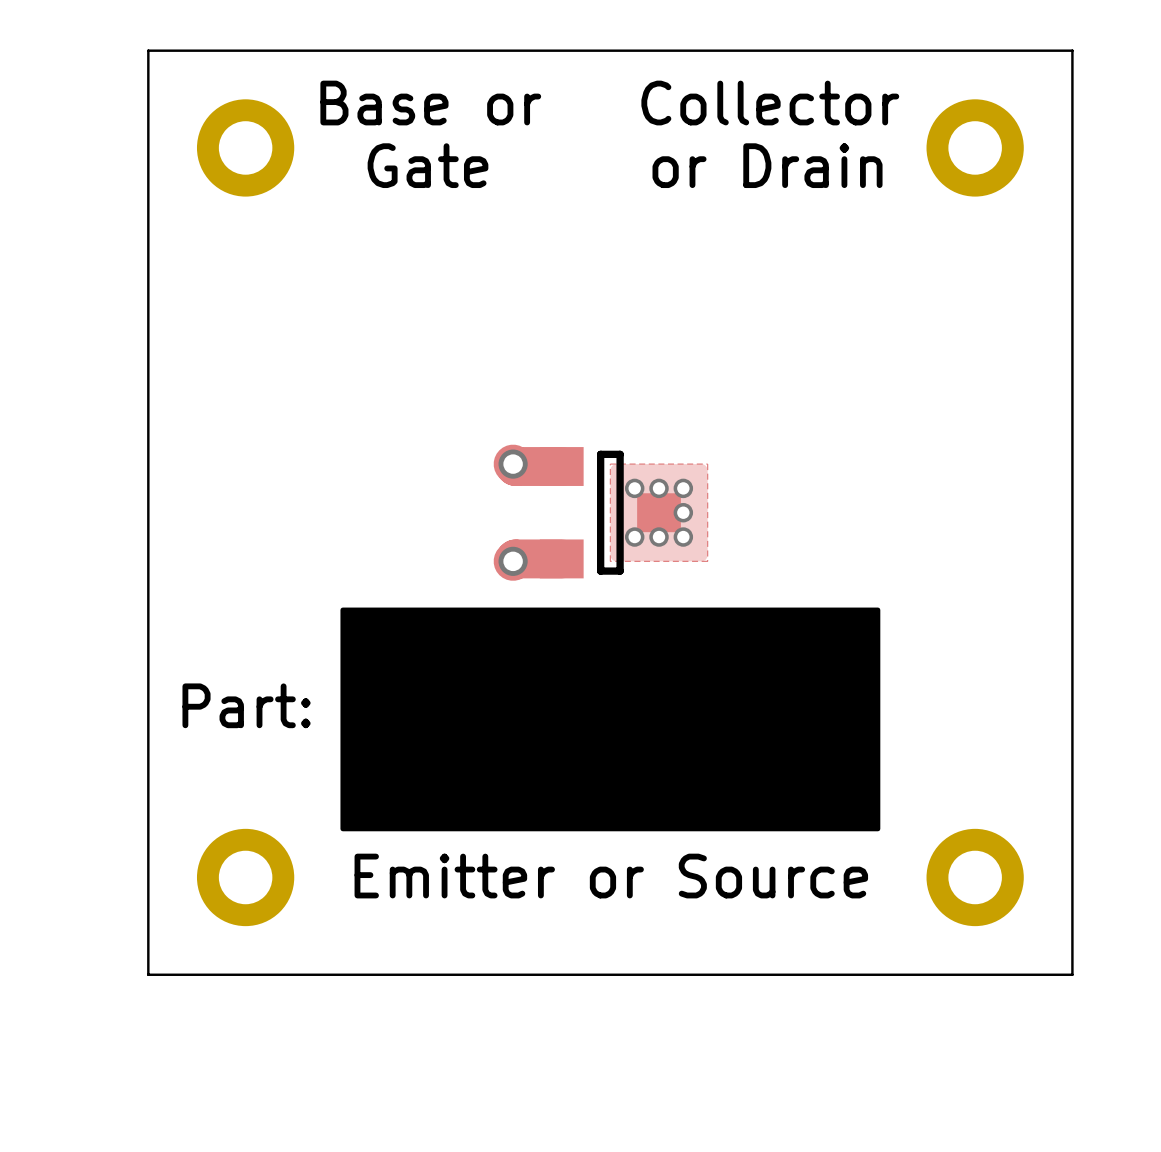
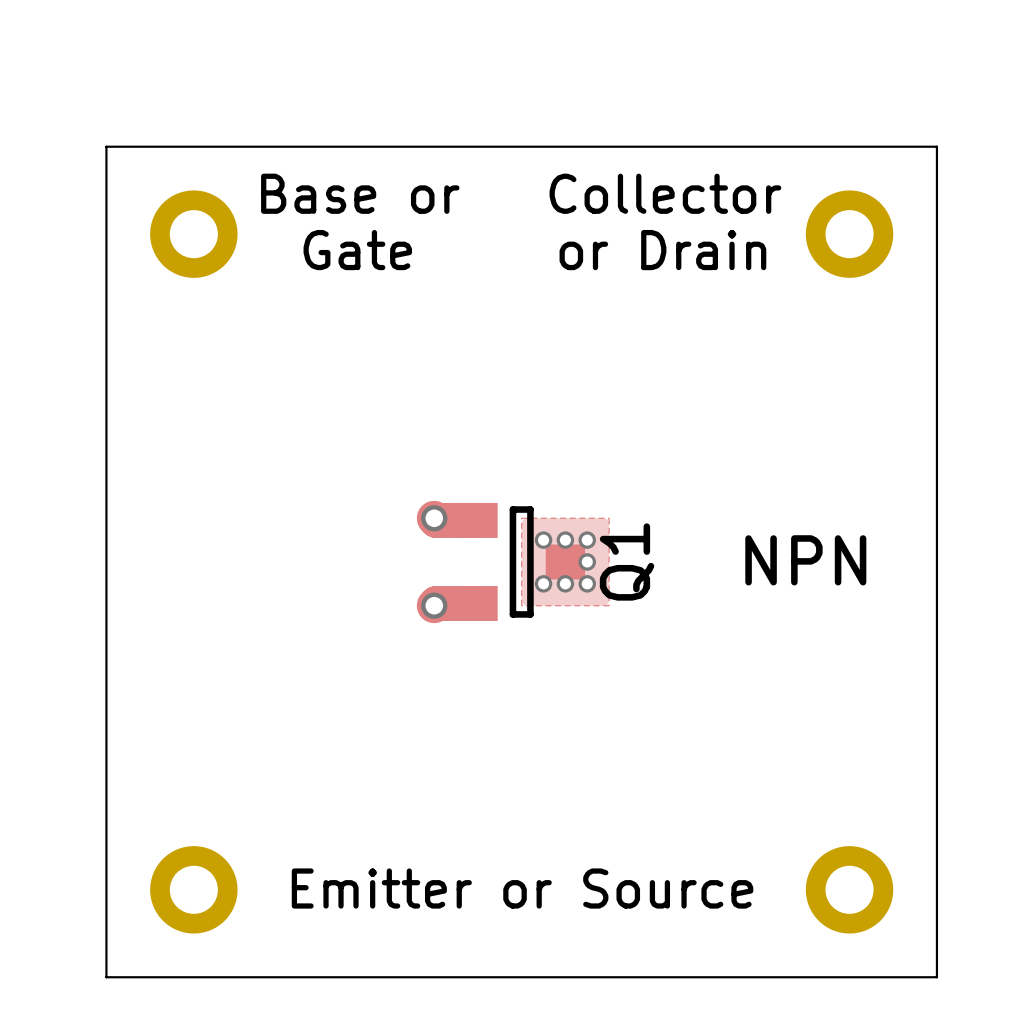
text: none -> NPN (805, 560)
Q1 name: none -> Q1 (627, 561)
drawing: [340, 607, 881, 832] -> none
text: Part: (246, 705) -> none

